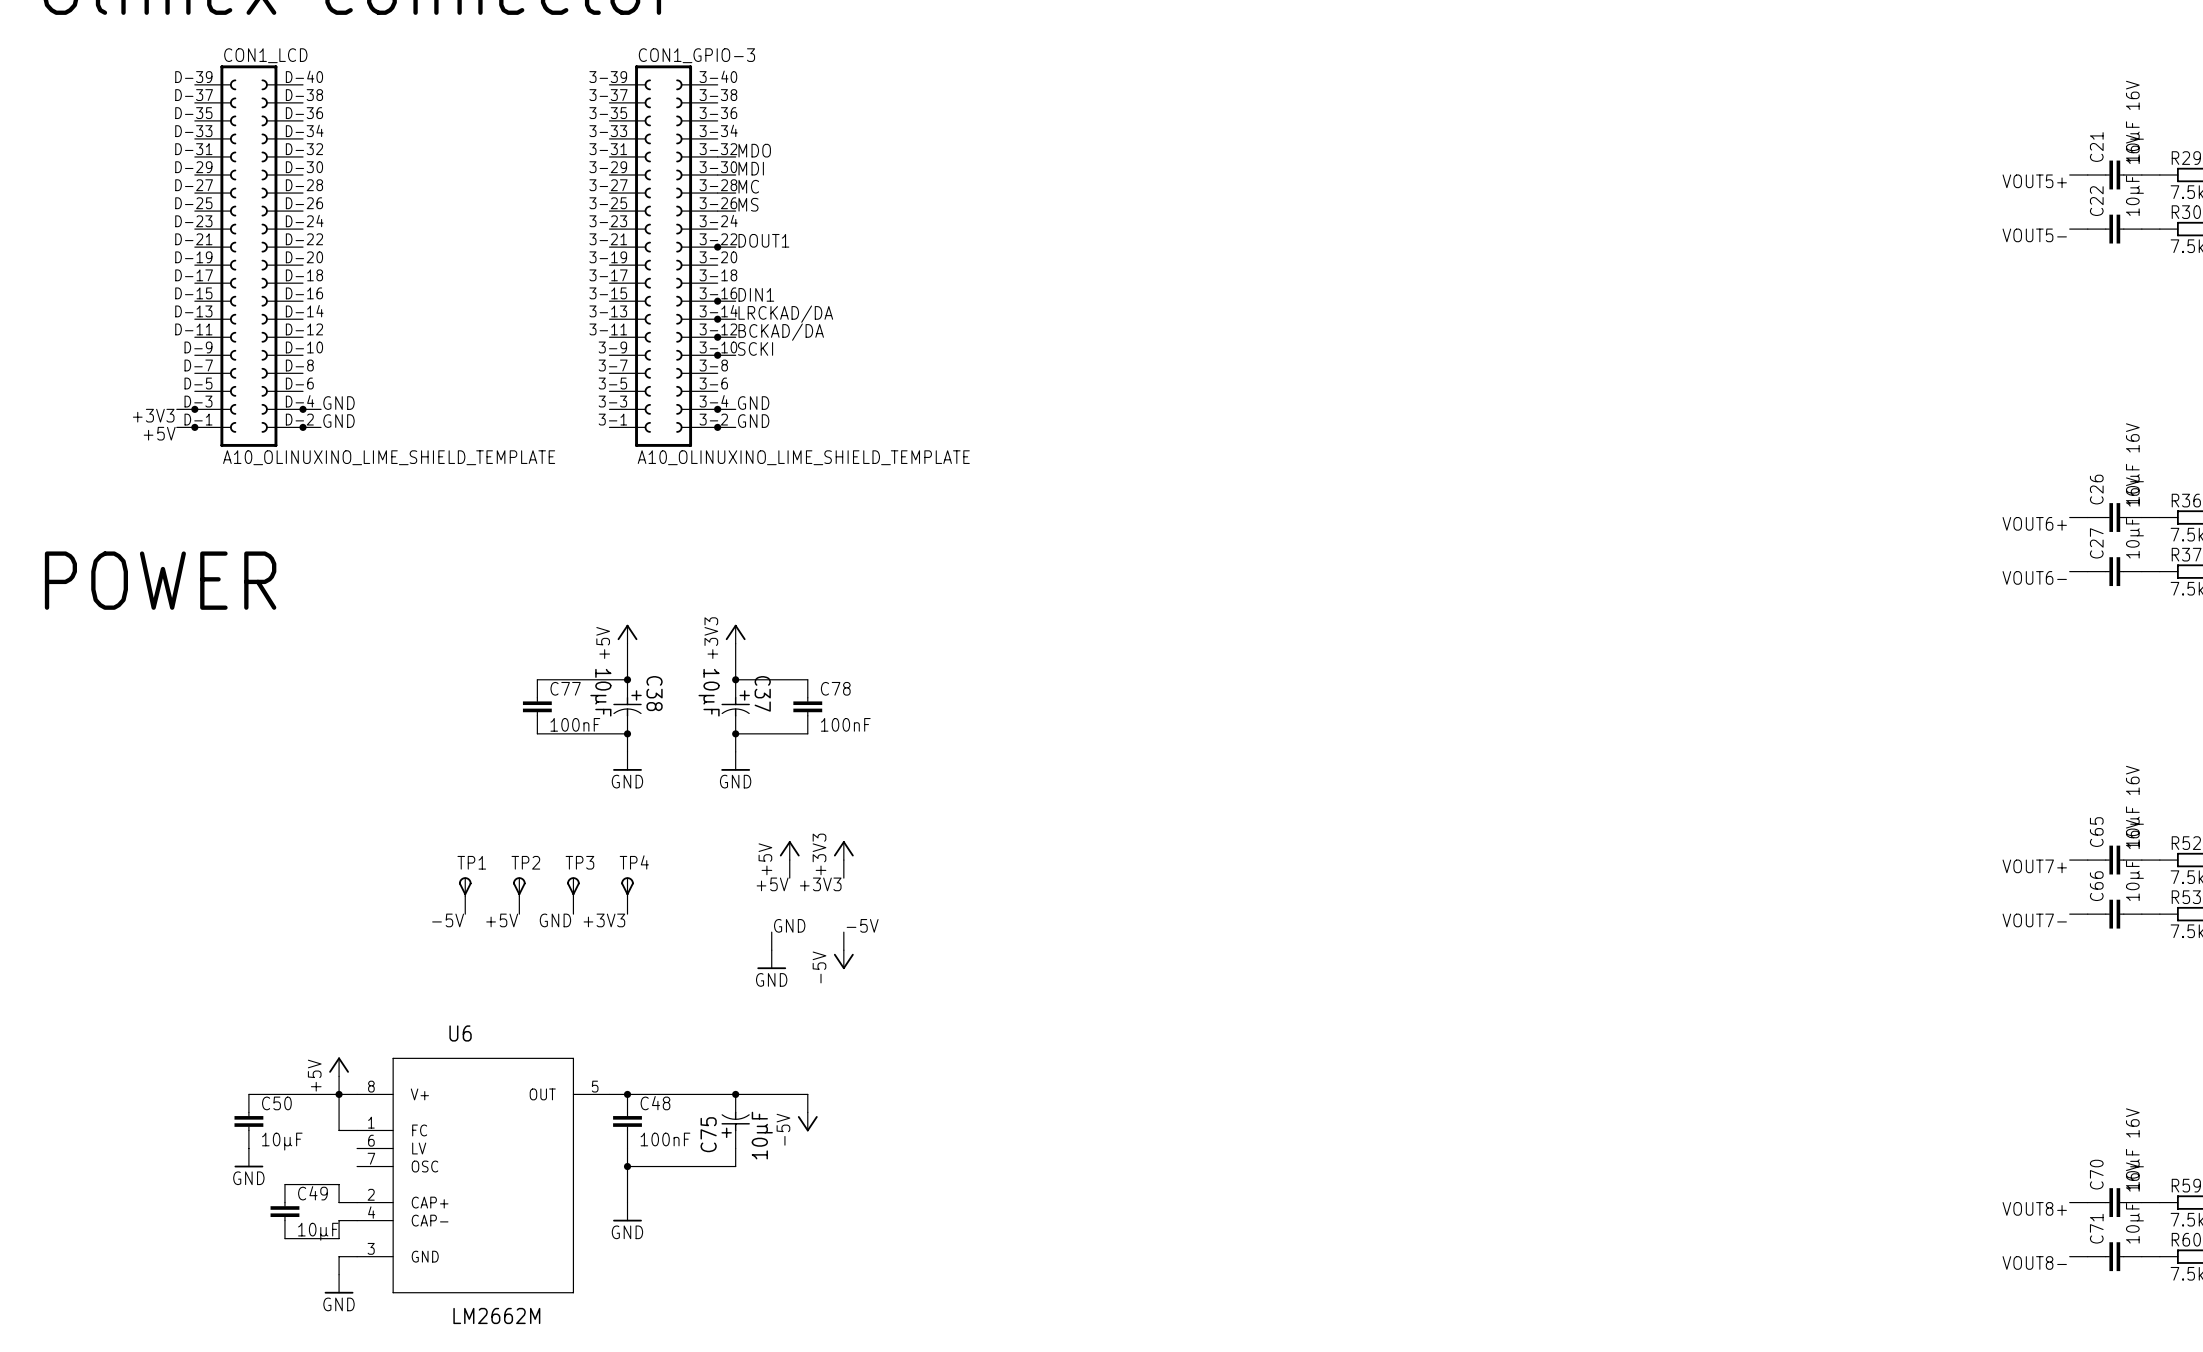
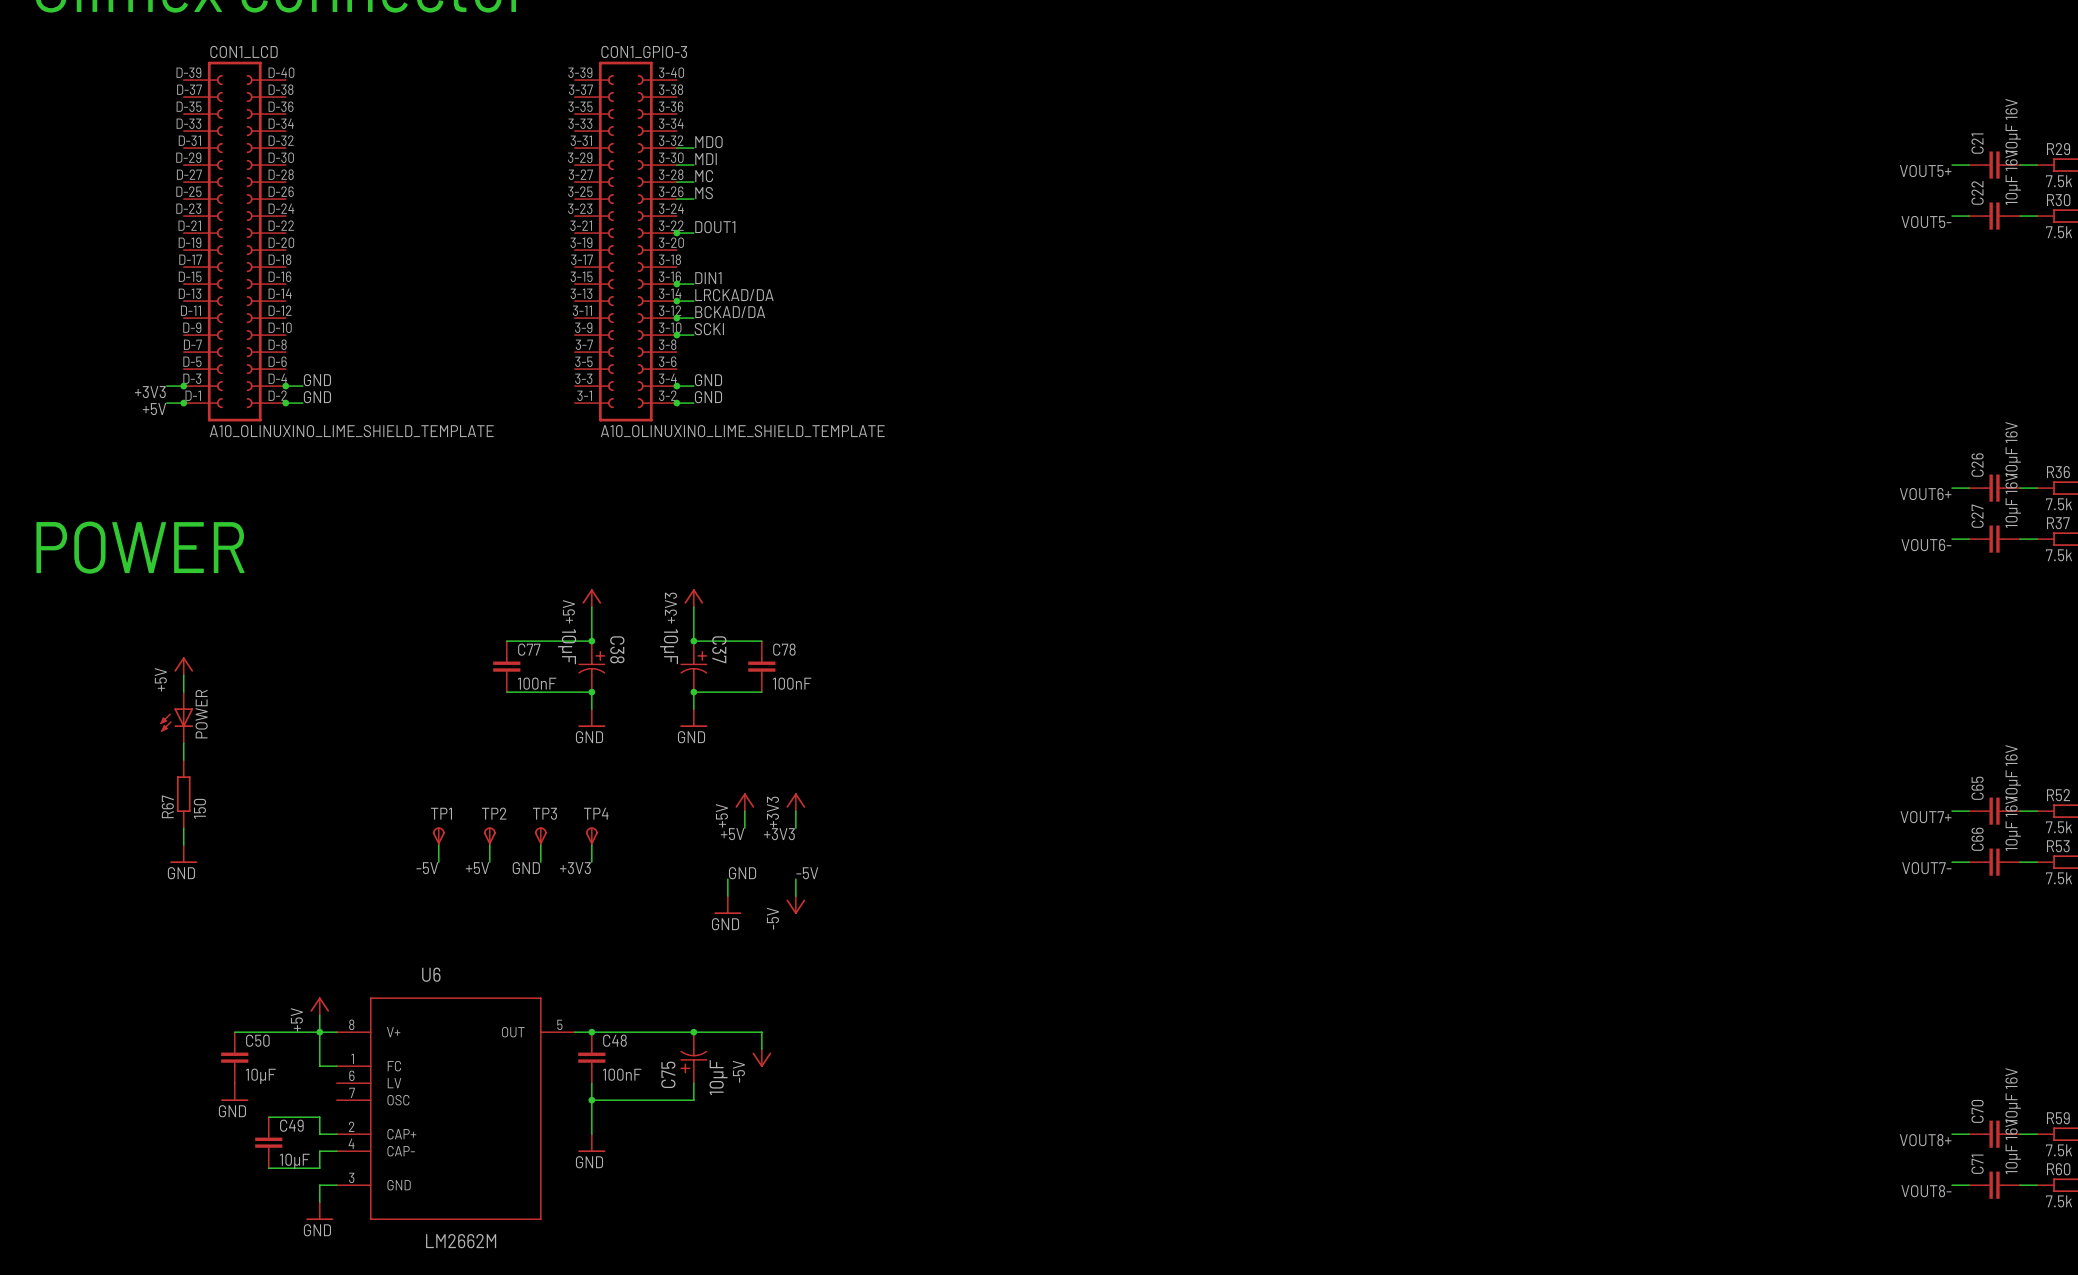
power symbol: none -> +5V (183, 666)
wire: none -> (183, 675) (183, 692)
POWER: none -> (176, 717)
wire: none -> (183, 743) (183, 760)
R67: none -> 150 (183, 794)
wire: none -> (183, 828) (183, 845)
power symbol: none -> GND (183, 854)

